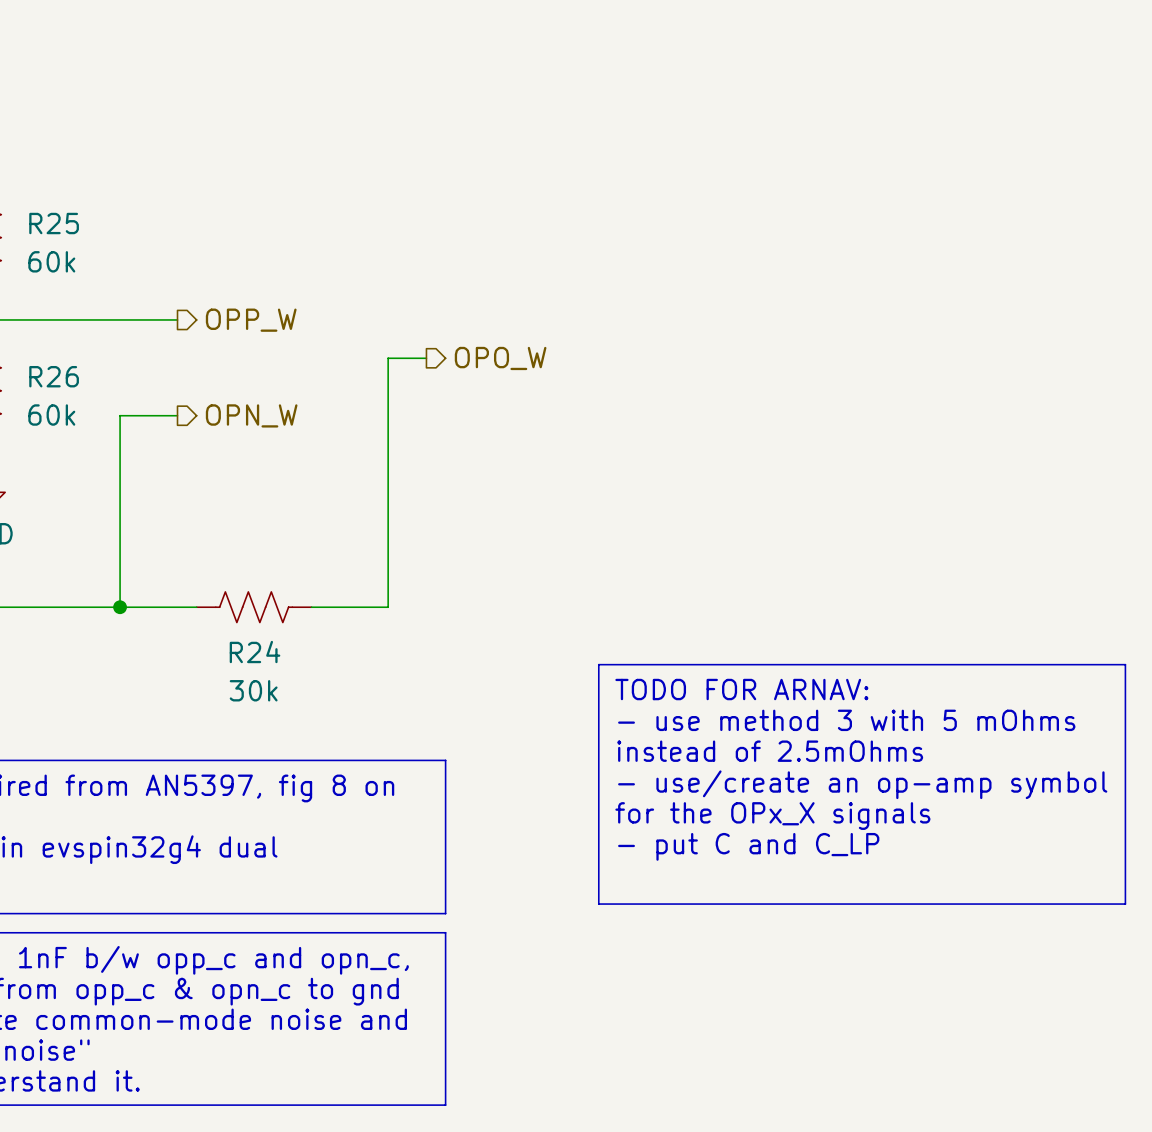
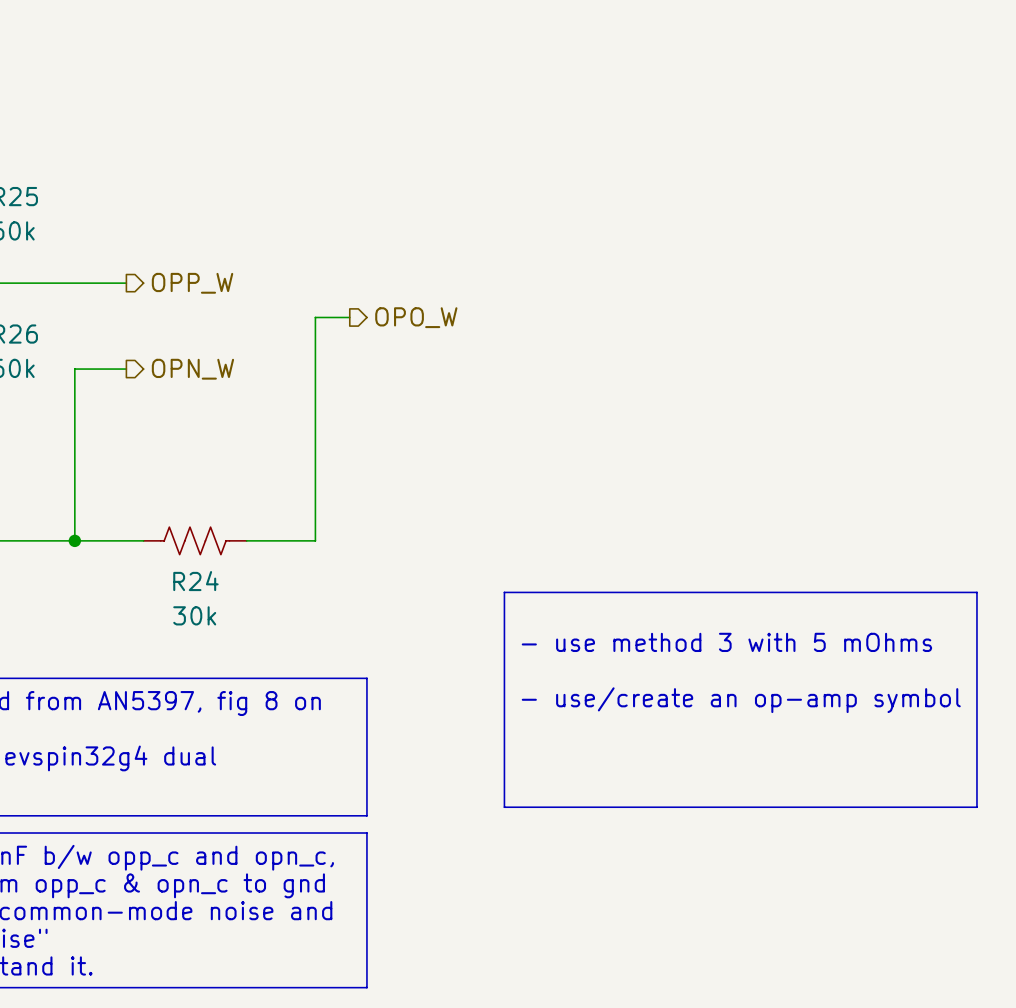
text: TODO FOR ARNAV: (741, 689) -> none
text: instead of 2.5mOhms (770, 751) -> none
text: for the OPx_X signals (772, 816) -> none
text: - put C and C_LP (748, 846) -> none

